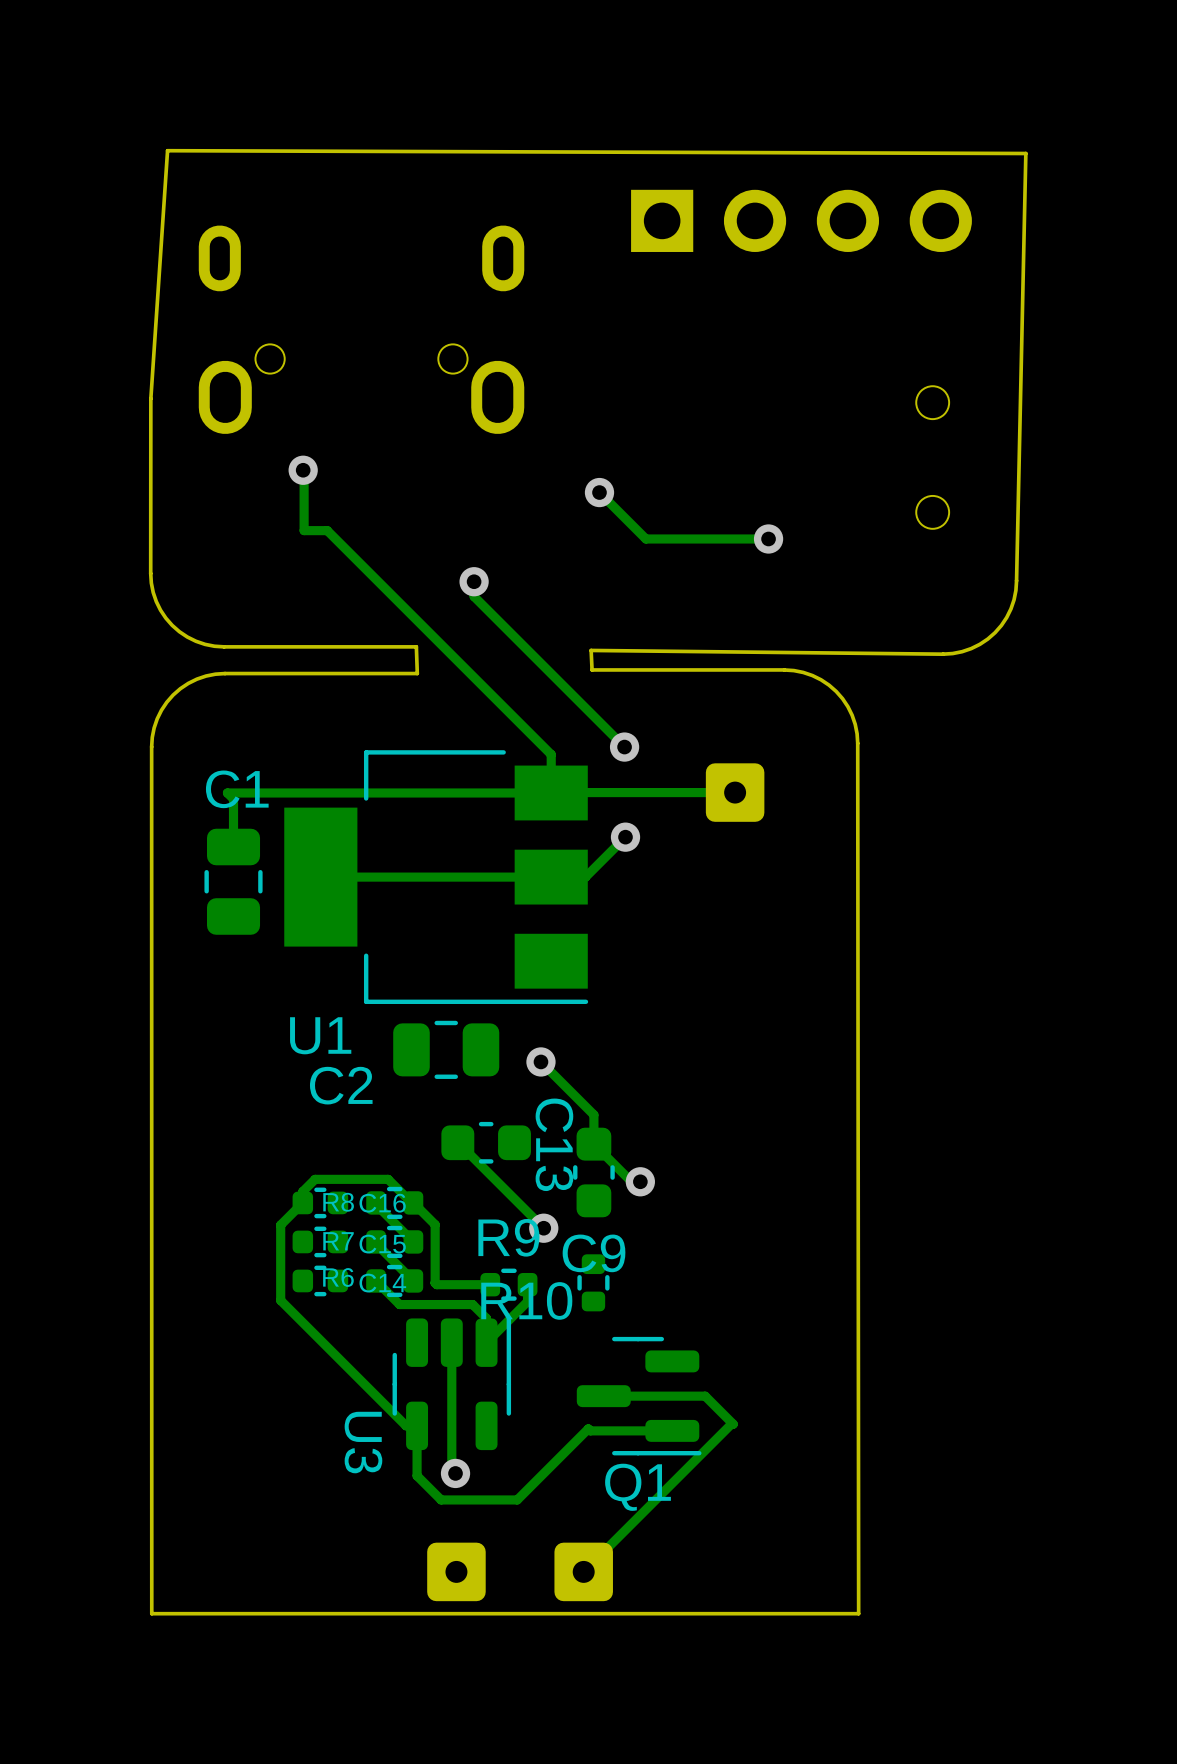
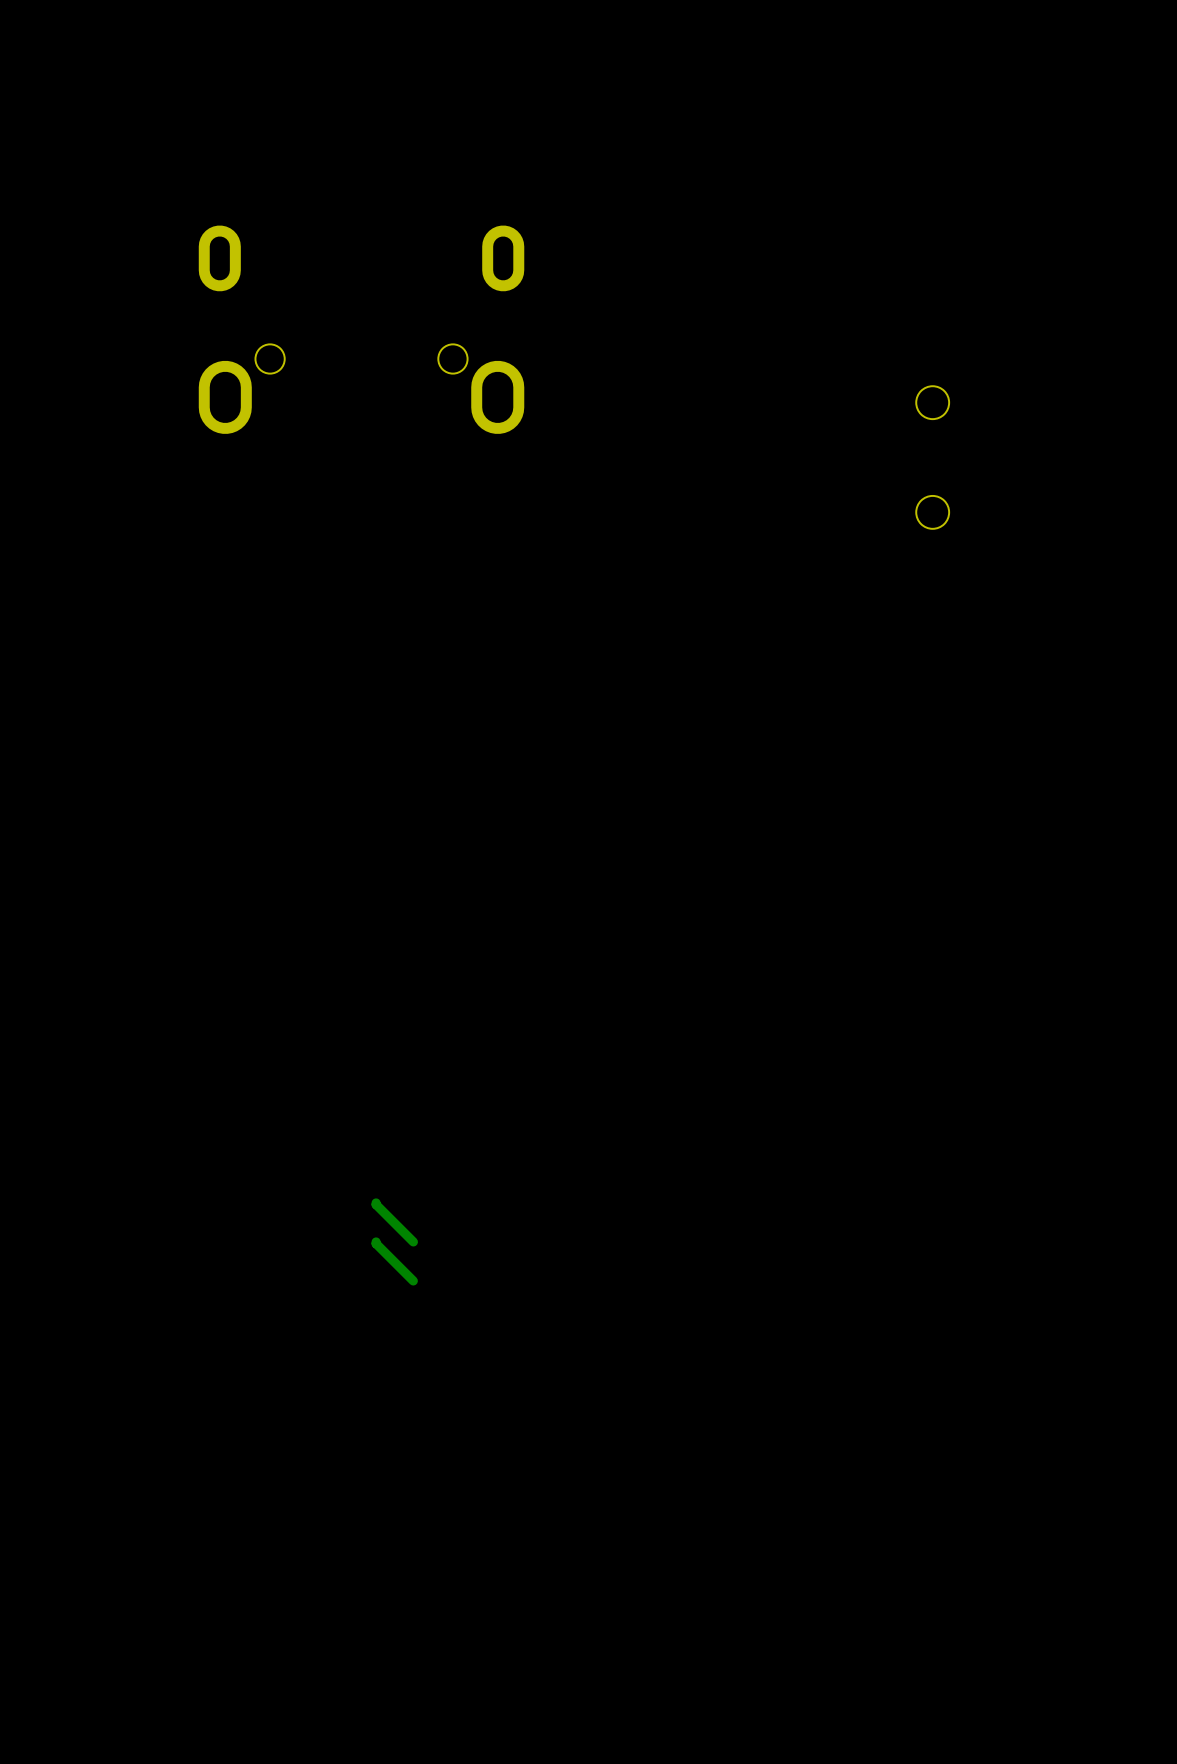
board edge: (167, 150) (150, 398) (150, 573) (156, 601) (165, 618) (179, 631) (205, 644) (224, 646) (416, 646) (417, 673) (225, 673) (206, 676) (188, 683) (173, 695) (161, 710) (154, 727) (151, 746) (151, 1613) (858, 1613) (857, 743) (855, 724) (847, 706) (836, 691) (821, 679) (803, 672) (784, 669) (592, 669) (591, 650) (943, 654) (962, 651) (979, 644) (1001, 625) (1014, 599) (1016, 580) (1025, 153) (167, 150) -> none
part: (801, 220) -> none
track: (303, 470) (304, 530) (327, 530) (551, 754) (551, 792) (227, 792) (233, 799) (233, 847) -> none
via: (303, 470) -> none
track: (599, 492) (645, 538) (768, 538) -> none
via: (599, 492) -> none
via: (768, 538) -> none
track: (474, 581) (474, 596) (624, 747) -> none
via: (474, 581) -> none
via: (624, 747) -> none
track: (735, 792) (551, 792) -> none
part: (735, 792) -> none
track: (625, 837) (585, 877) (320, 877) -> none
via: (625, 837) -> none
U1: (436, 877) -> none
C1: (233, 881) -> none
C2: (446, 1049) -> none
track: (540, 1061) (593, 1114) (593, 1144) (631, 1181) (640, 1181) -> none
via: (540, 1061) -> none
track: (458, 1142) (543, 1228) -> none
C13: (486, 1142) -> none
C9: (593, 1172) -> none
via: (640, 1181) -> none
C16: (320, 1202) -> none
R8: (394, 1202) -> none
via: (543, 1228) -> none
C15: (320, 1241) -> none
R7: (394, 1241) -> none
C14: (320, 1280) -> none
track: (376, 1280) (399, 1304) (472, 1304) (486, 1318) (486, 1342) (527, 1301) (527, 1284) -> none
R6: (394, 1280) -> none
track: (435, 1282) (435, 1224) (388, 1179) (315, 1179) (302, 1191) (302, 1202) (280, 1225) (280, 1300) (406, 1425) (417, 1425) (417, 1475) (441, 1499) (517, 1499) (588, 1428) (590, 1430) (672, 1430) -> none
R10: (593, 1282) -> none
track: (435, 1283) (436, 1284) (490, 1284) -> none
R9: (508, 1284) -> none
track: (451, 1342) (451, 1469) (455, 1473) -> none
U3: (451, 1383) -> none
track: (603, 1396) (705, 1396) (733, 1424) (583, 1571) -> none
Q1: (639, 1396) -> none
via: (455, 1473) -> none
part: (456, 1571) -> none
part: (583, 1571) -> none

